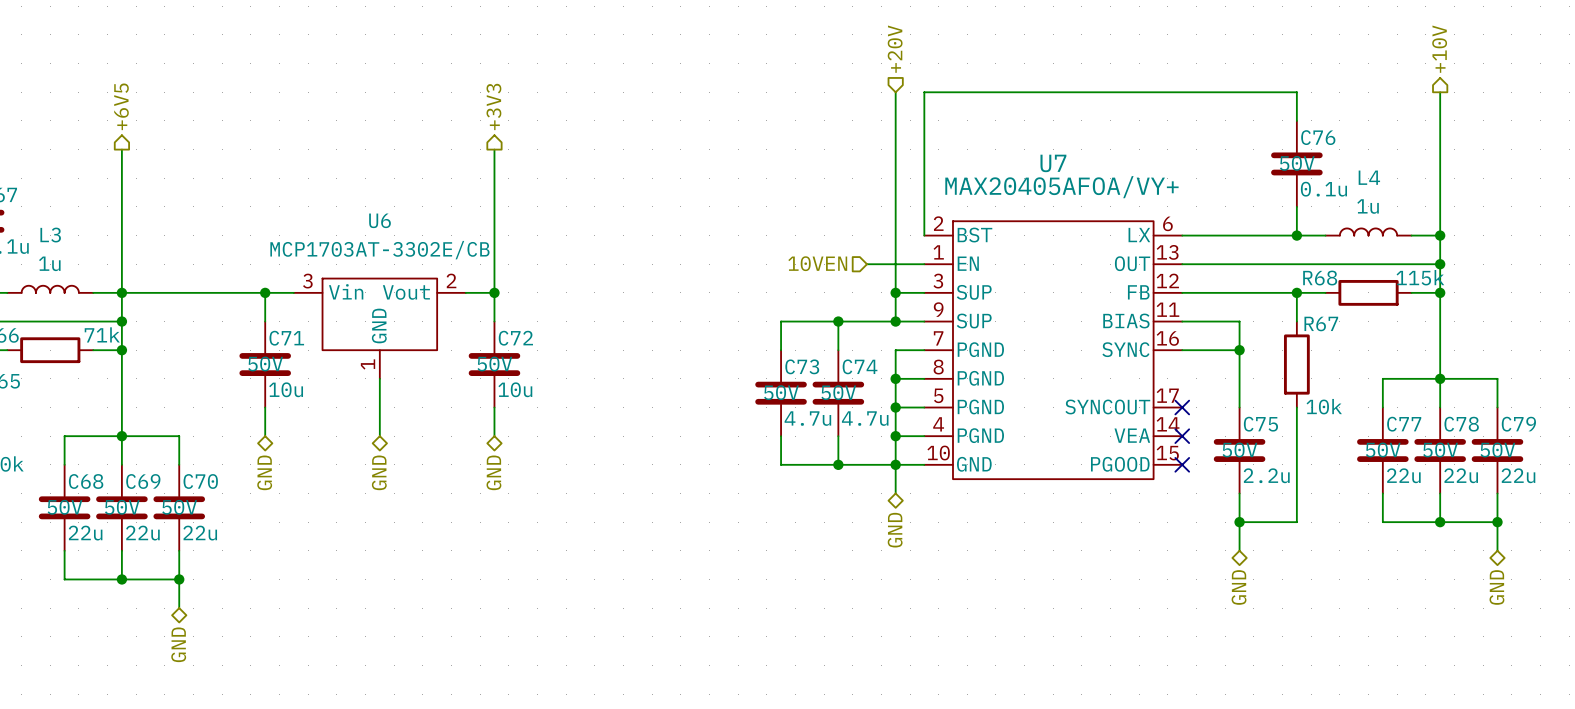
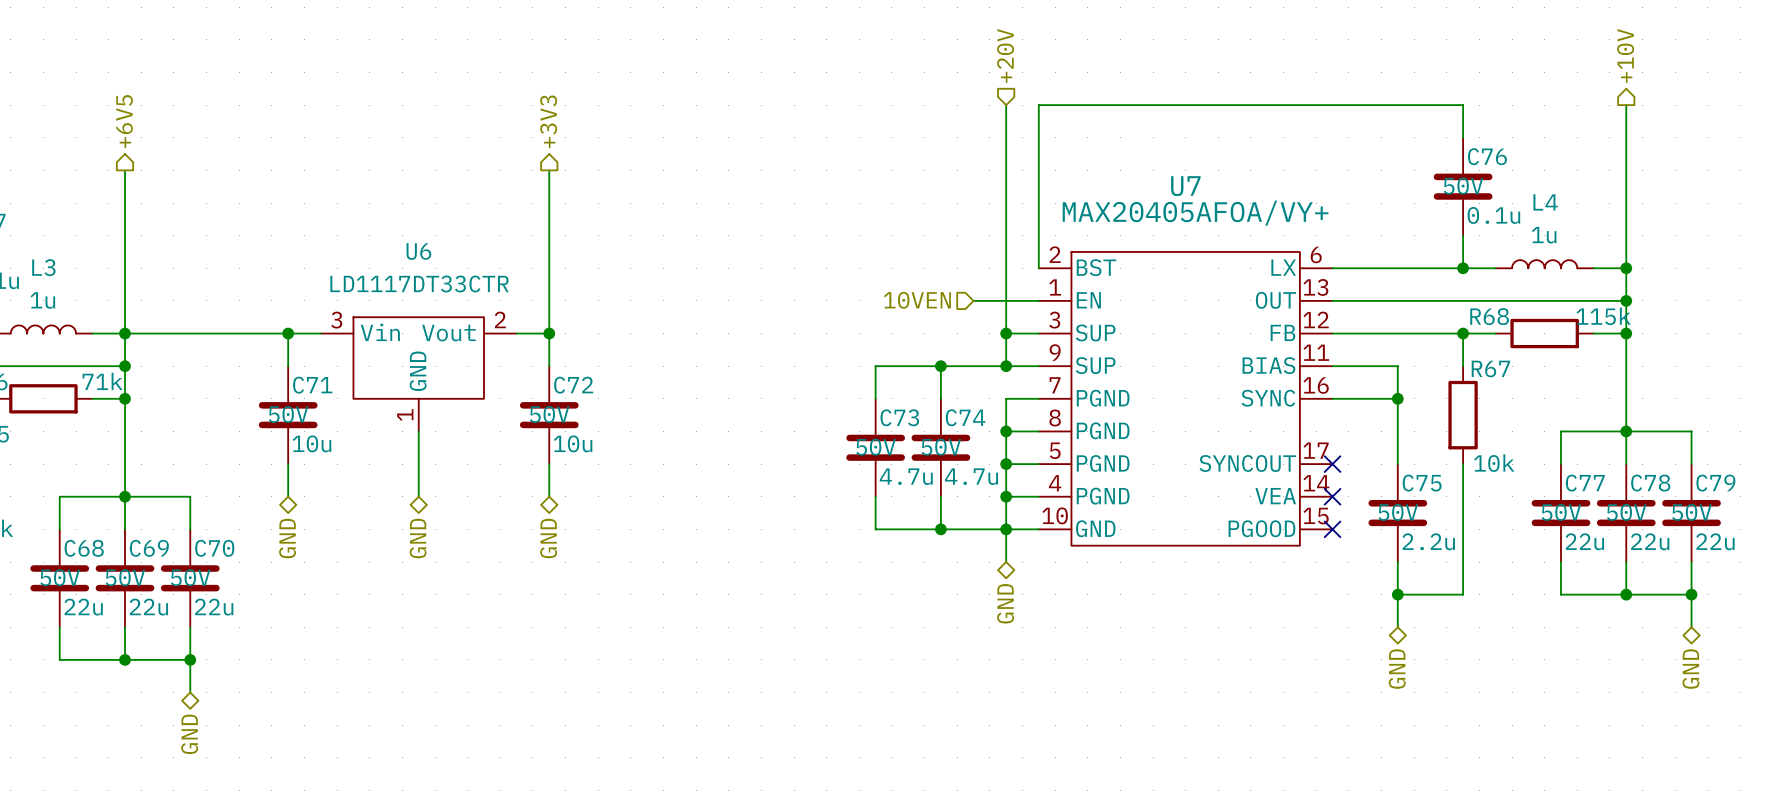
U6 value: MCP1703AT-3302E/CB (379, 250) -> LD1117DT33CTR (419, 283)

